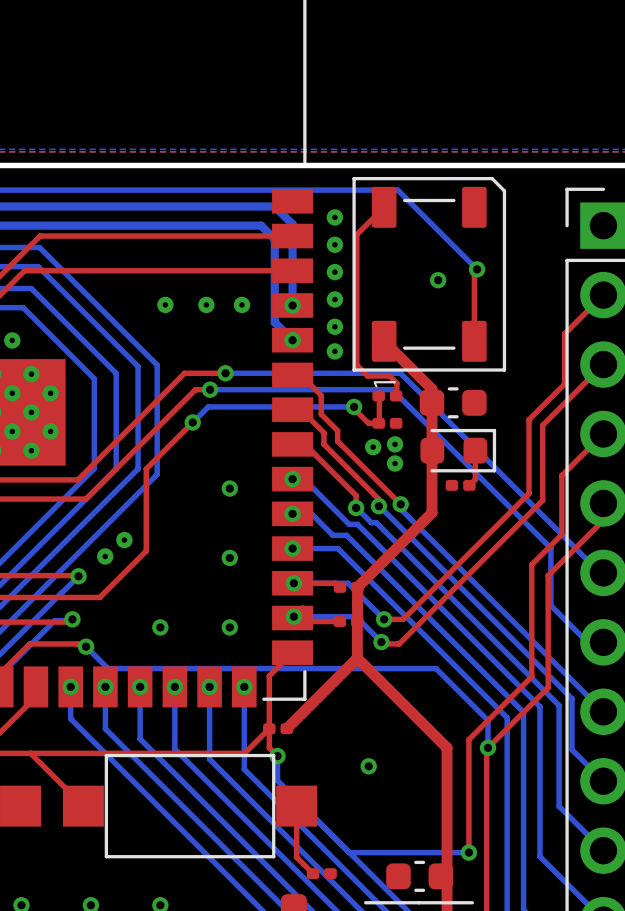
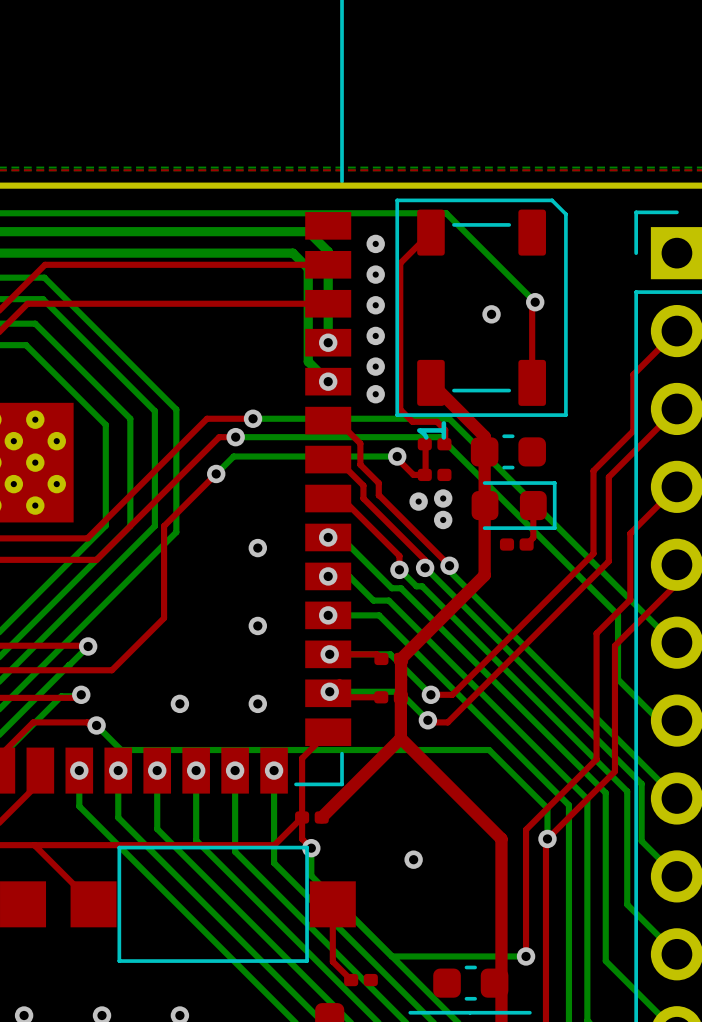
via: (165, 304) -> none
via: (206, 304) -> none
via: (241, 304) -> none
via: (12, 340) -> none
via: (124, 540) -> none
via: (105, 556) -> none

